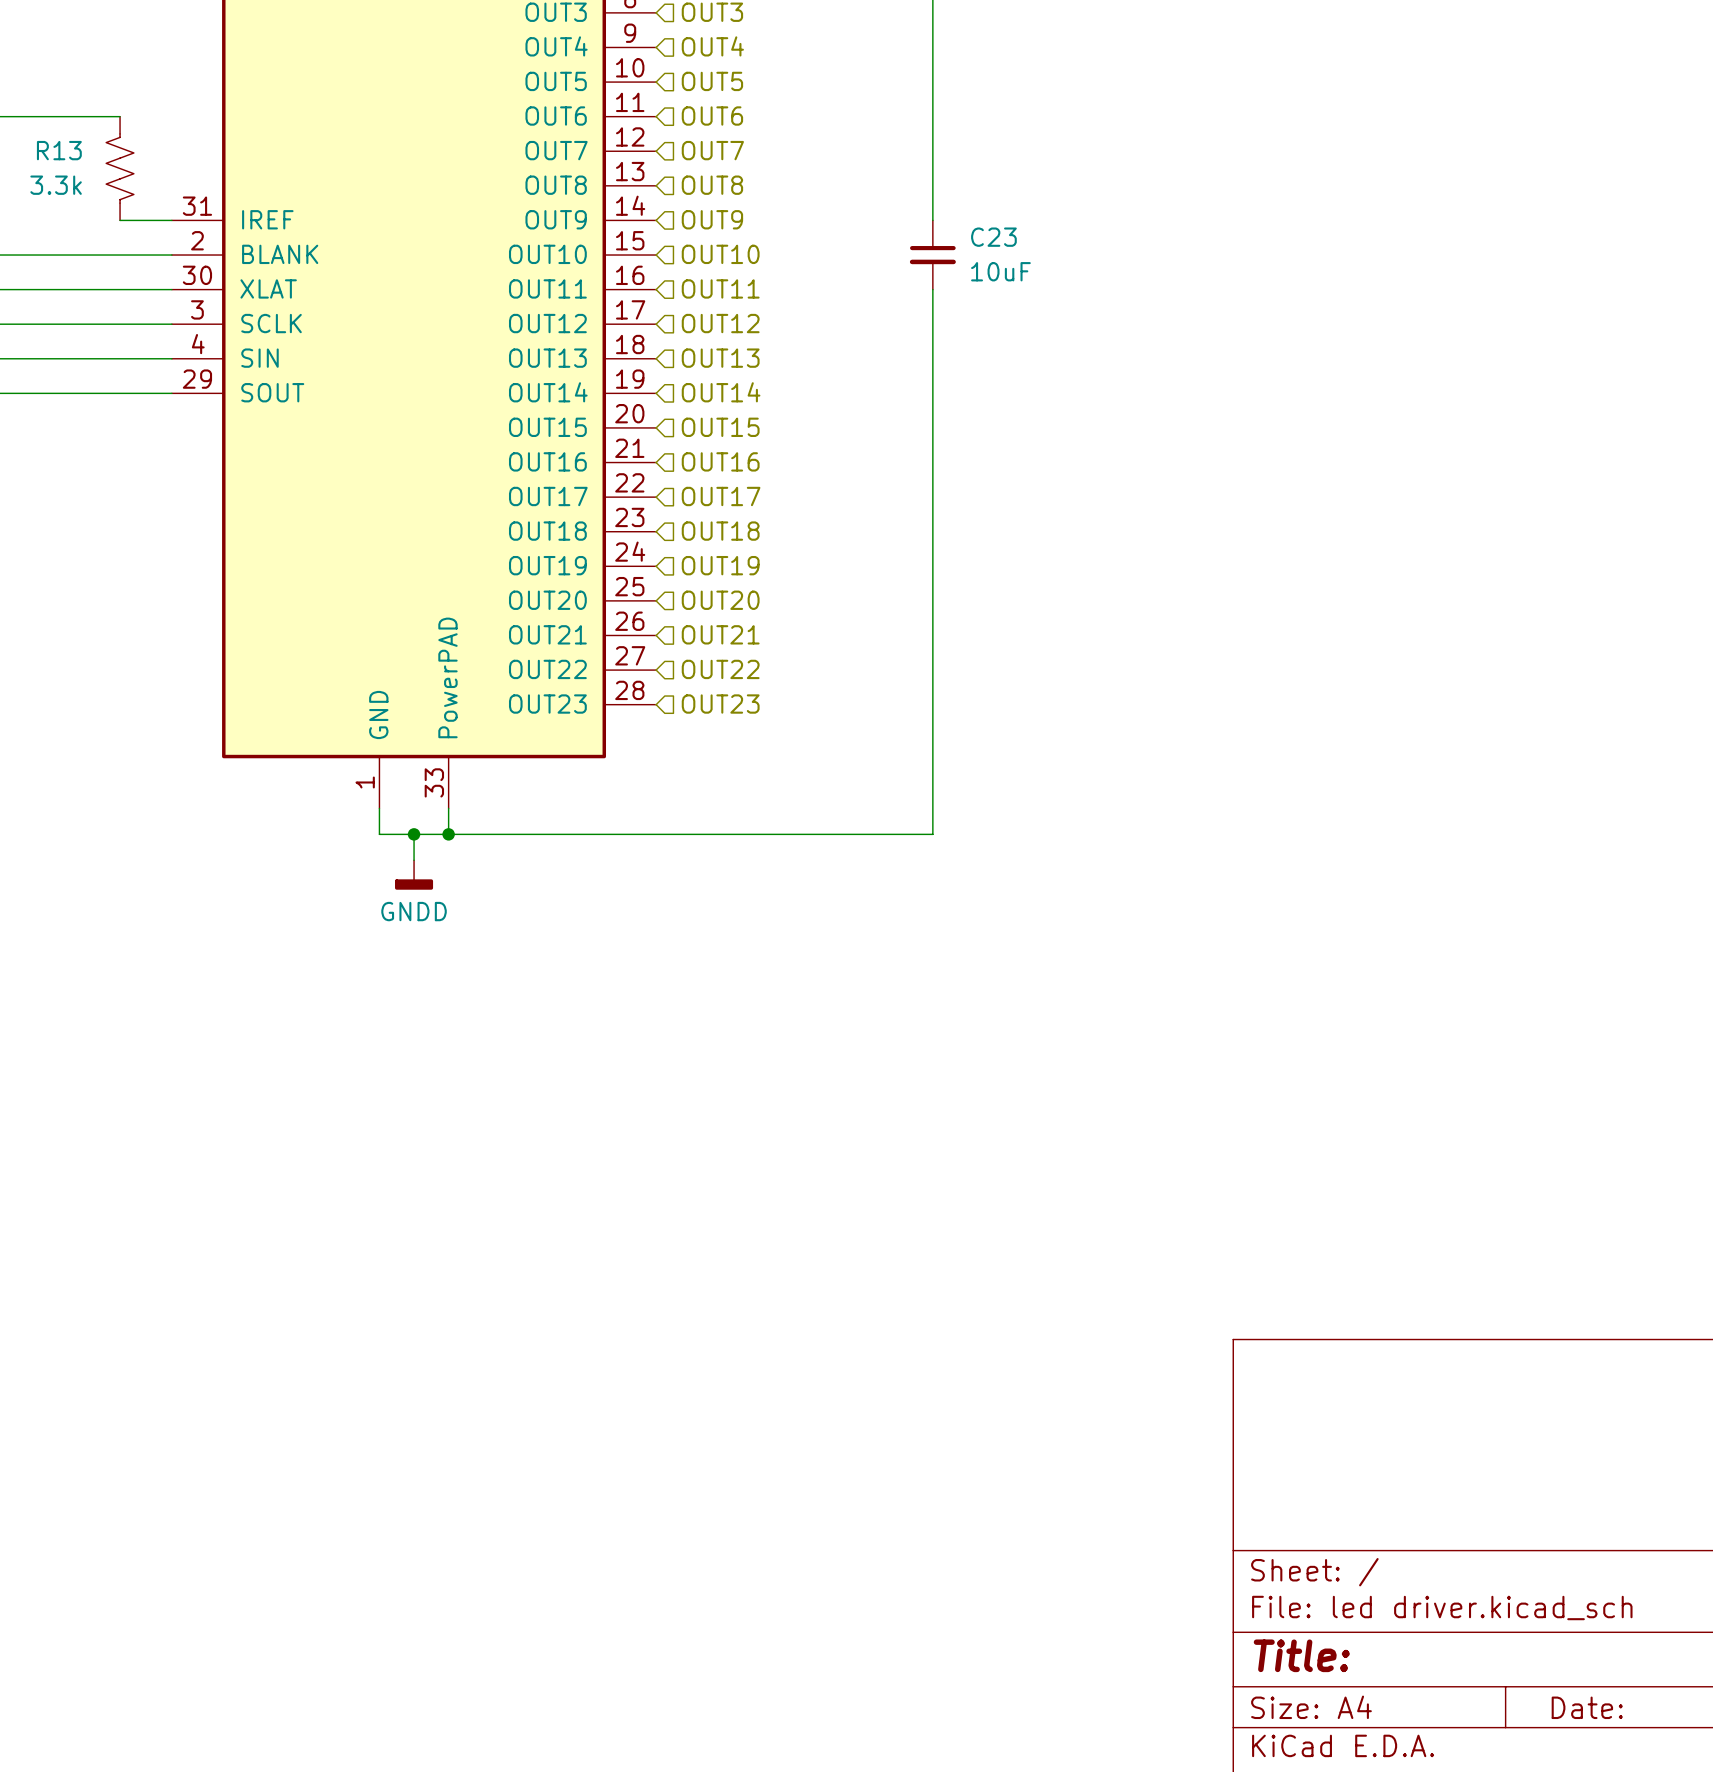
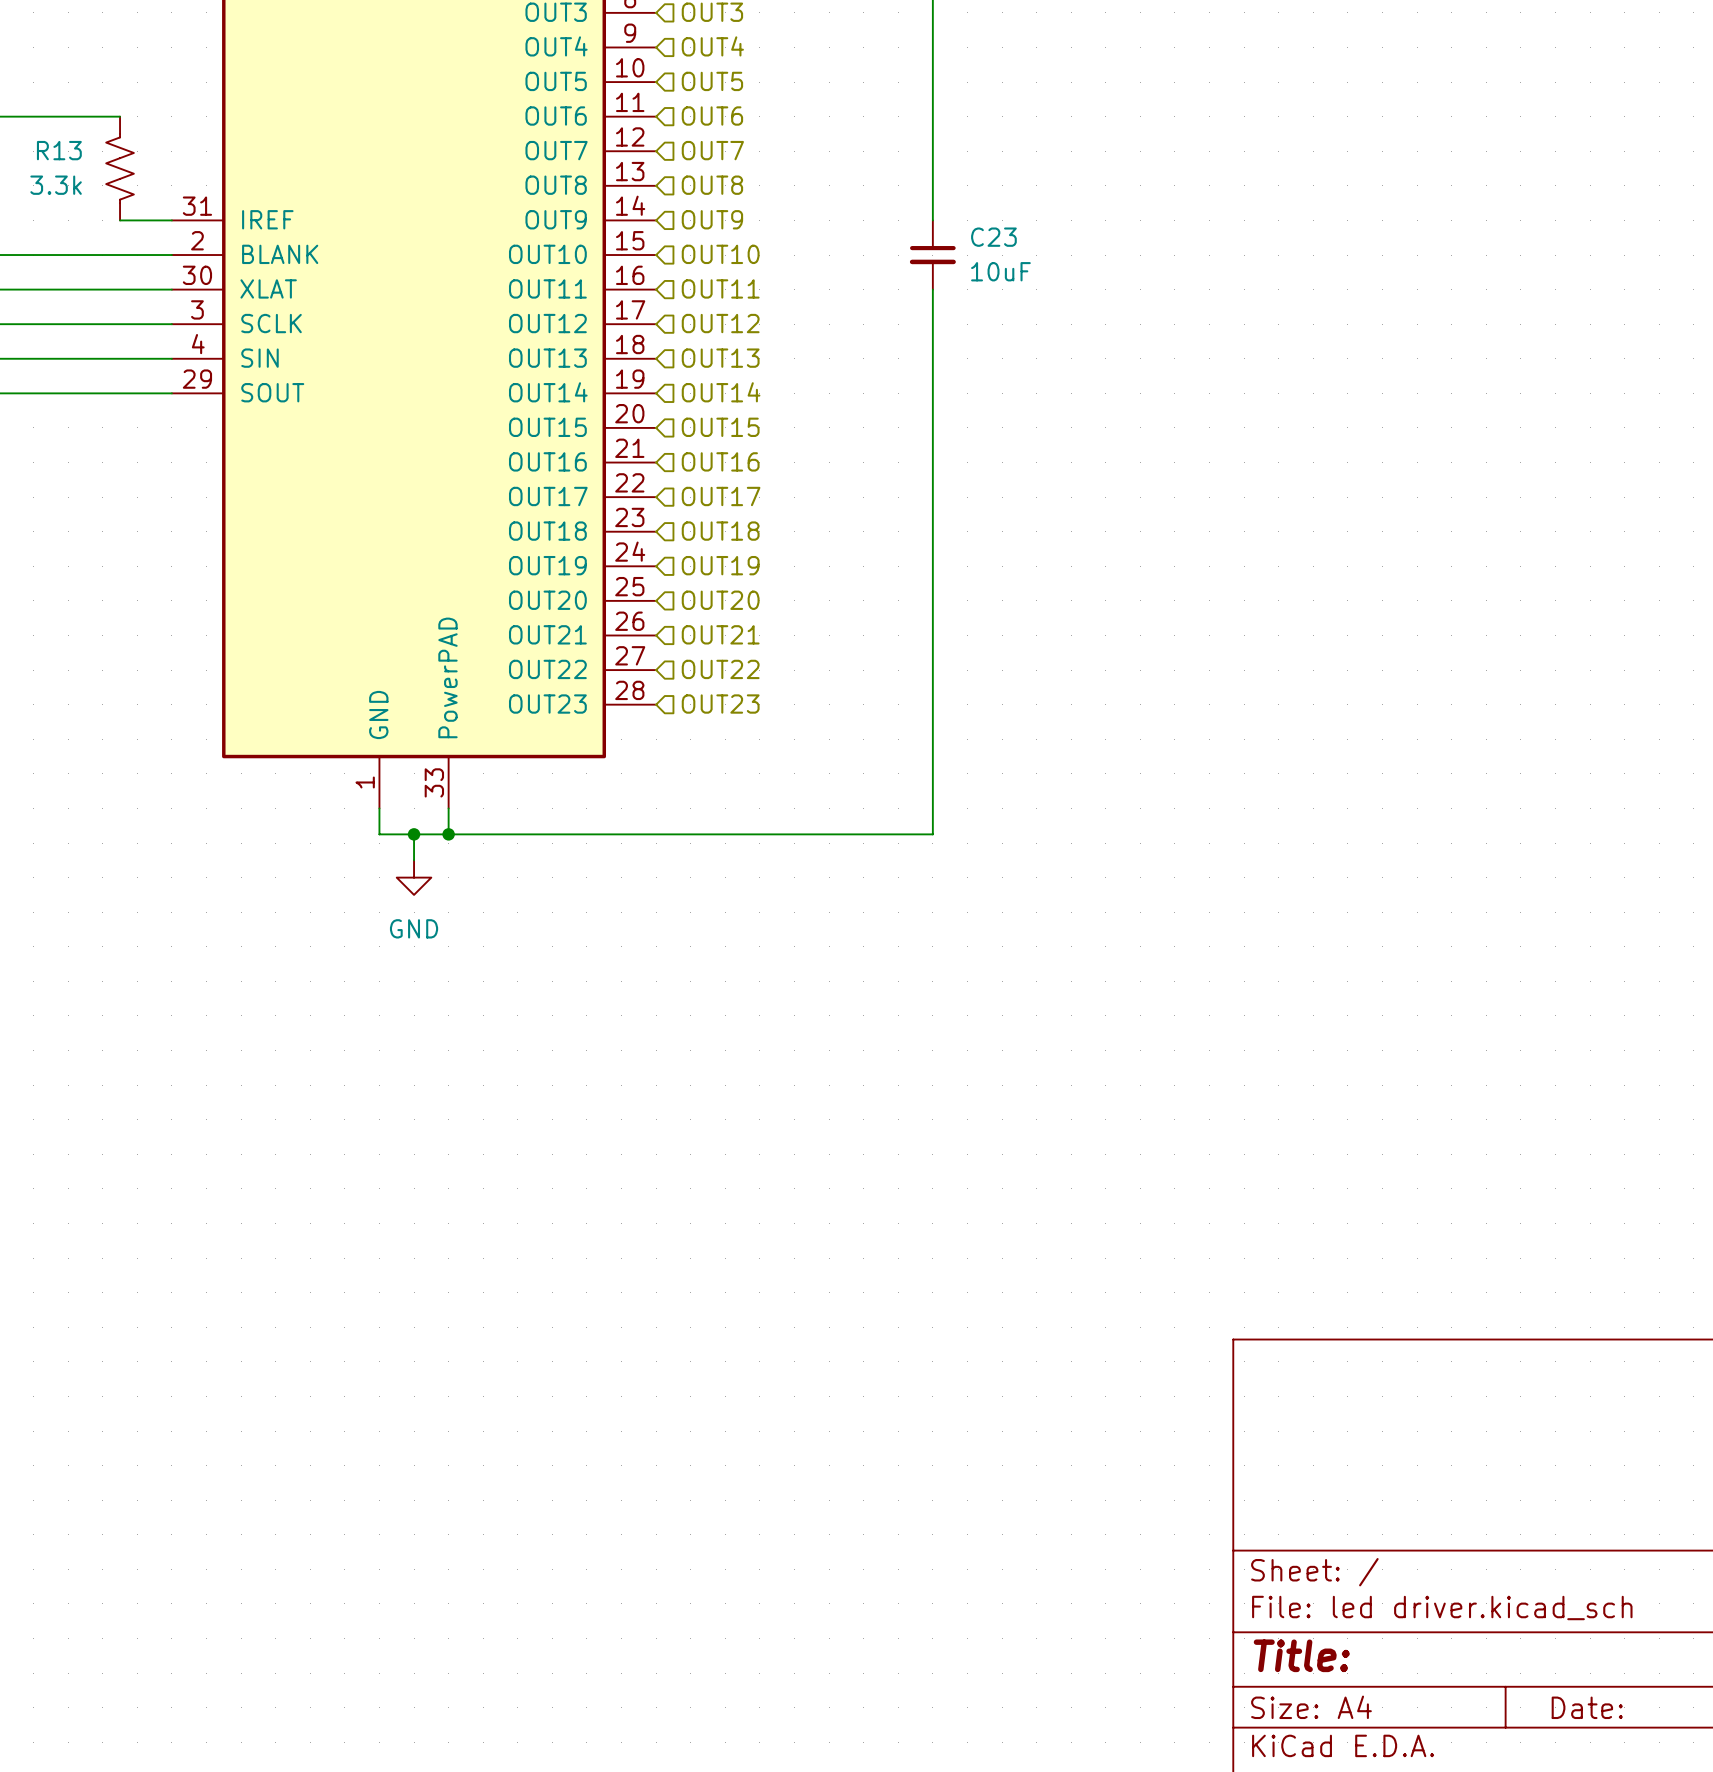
power symbol: GNDD (414, 875) -> GND (414, 877)

